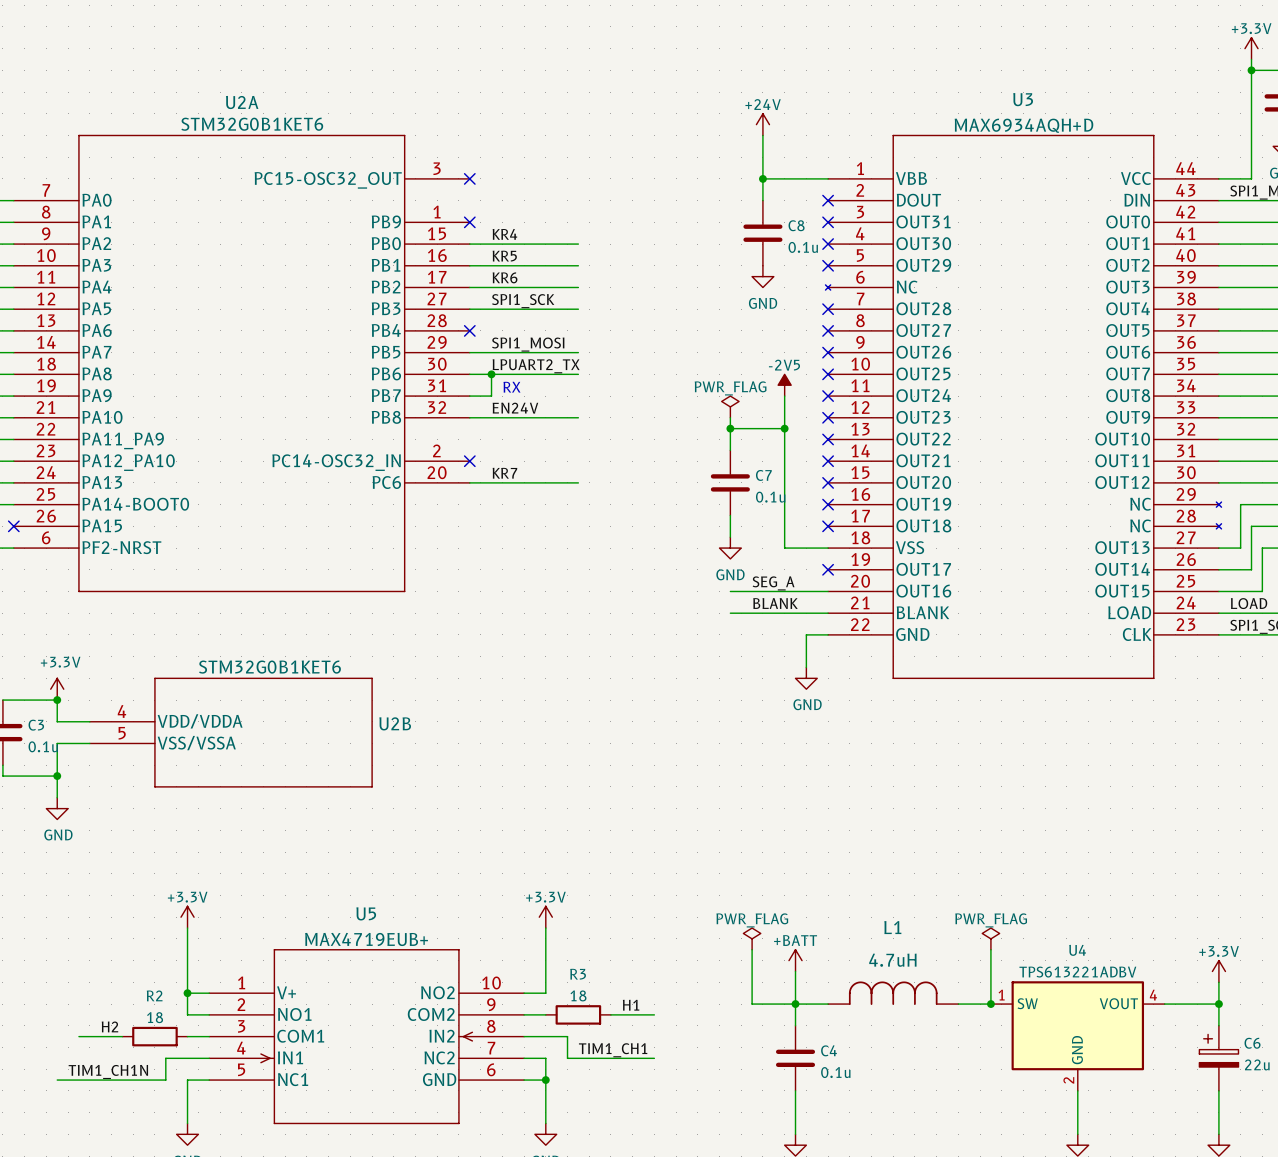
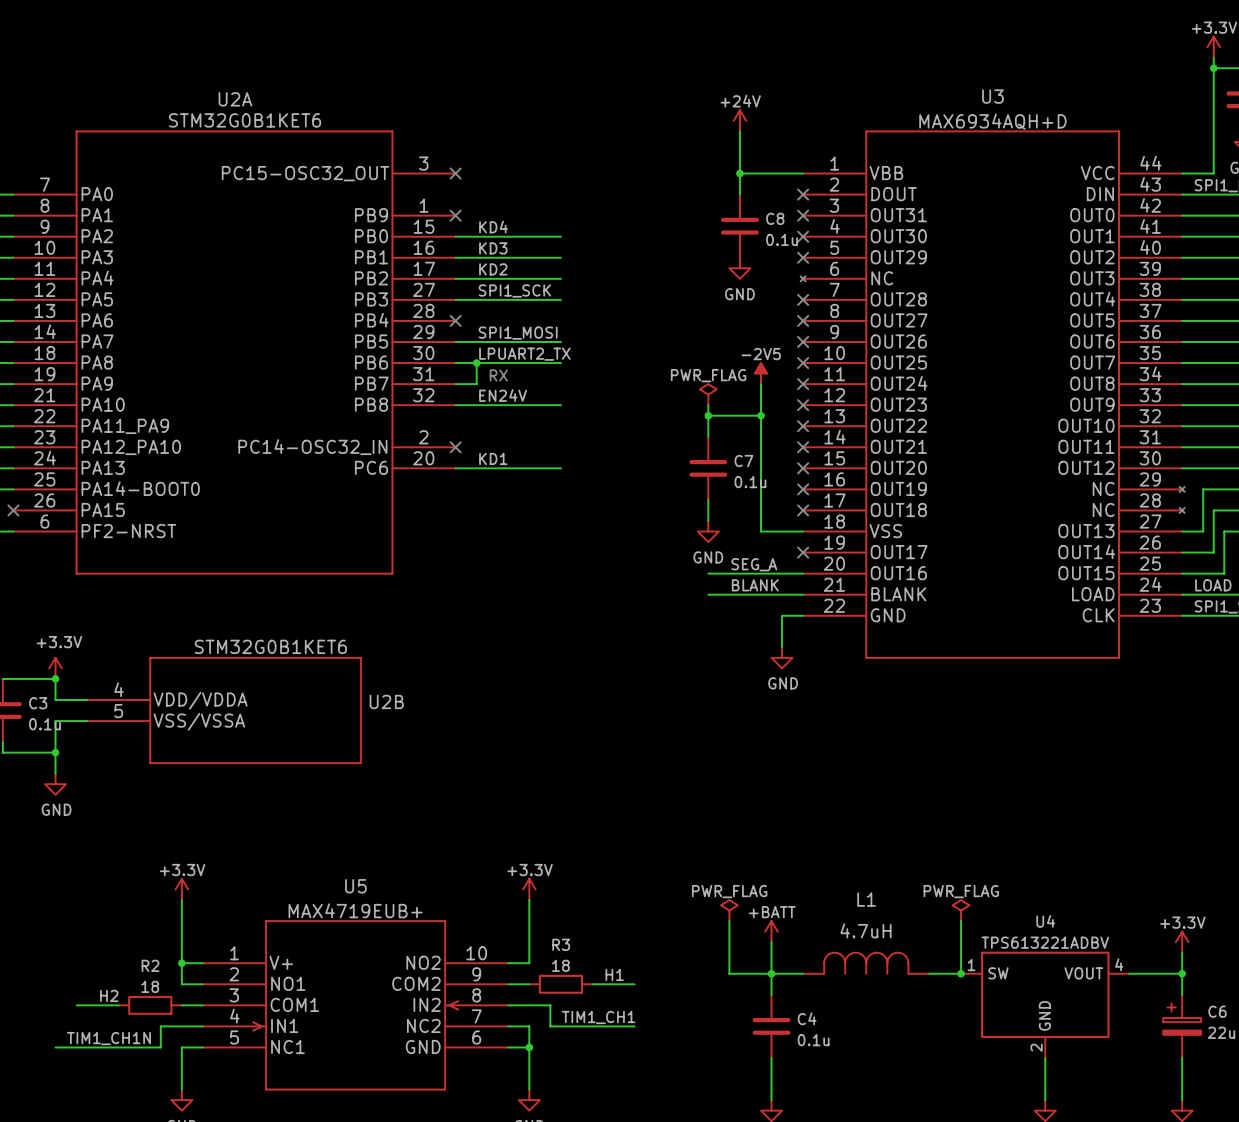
label: KR4 (504, 234) -> KD4 (493, 227)
label: KR5 (504, 256) -> KD3 (493, 248)
label: KR6 (505, 277) -> KD2 (493, 269)
label: KR7 (504, 473) -> KD1 (493, 458)

